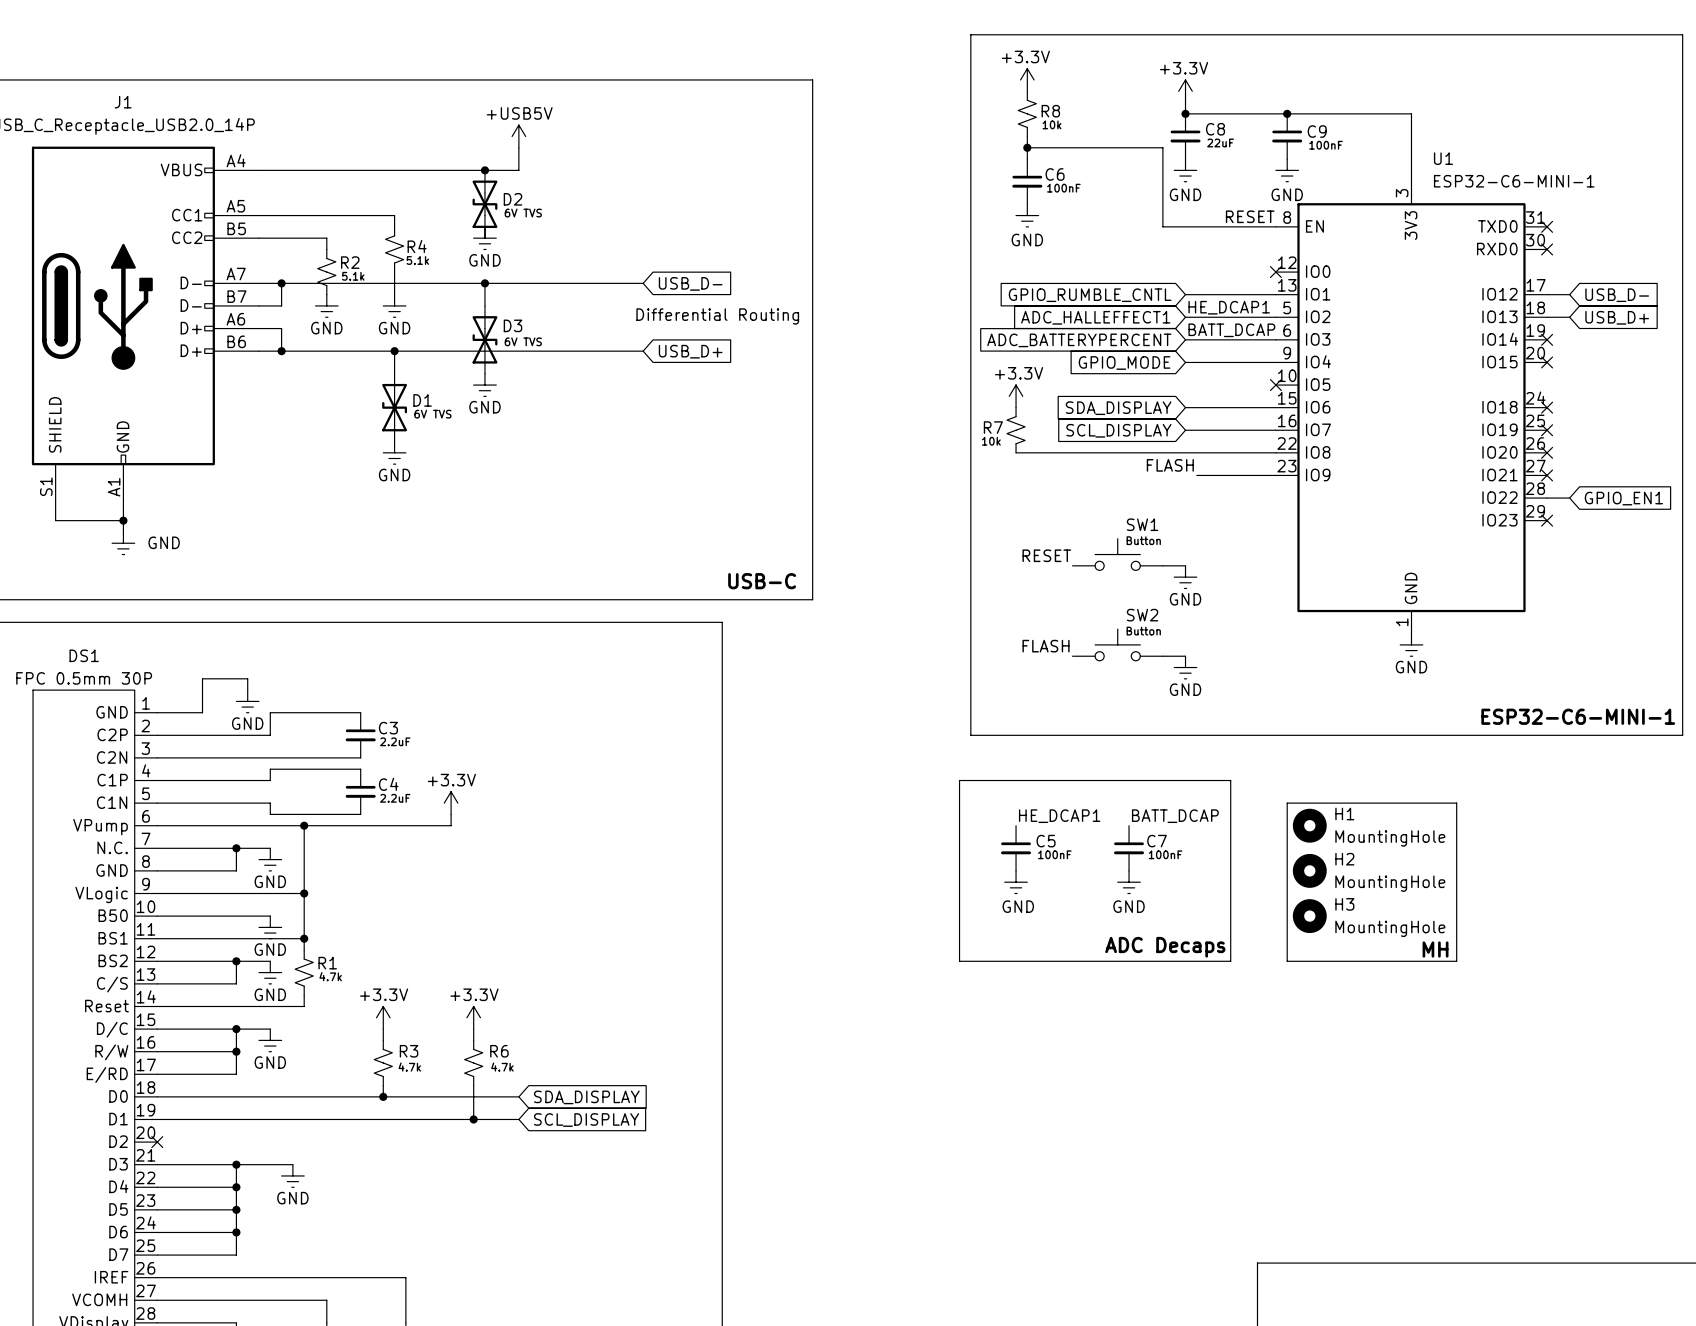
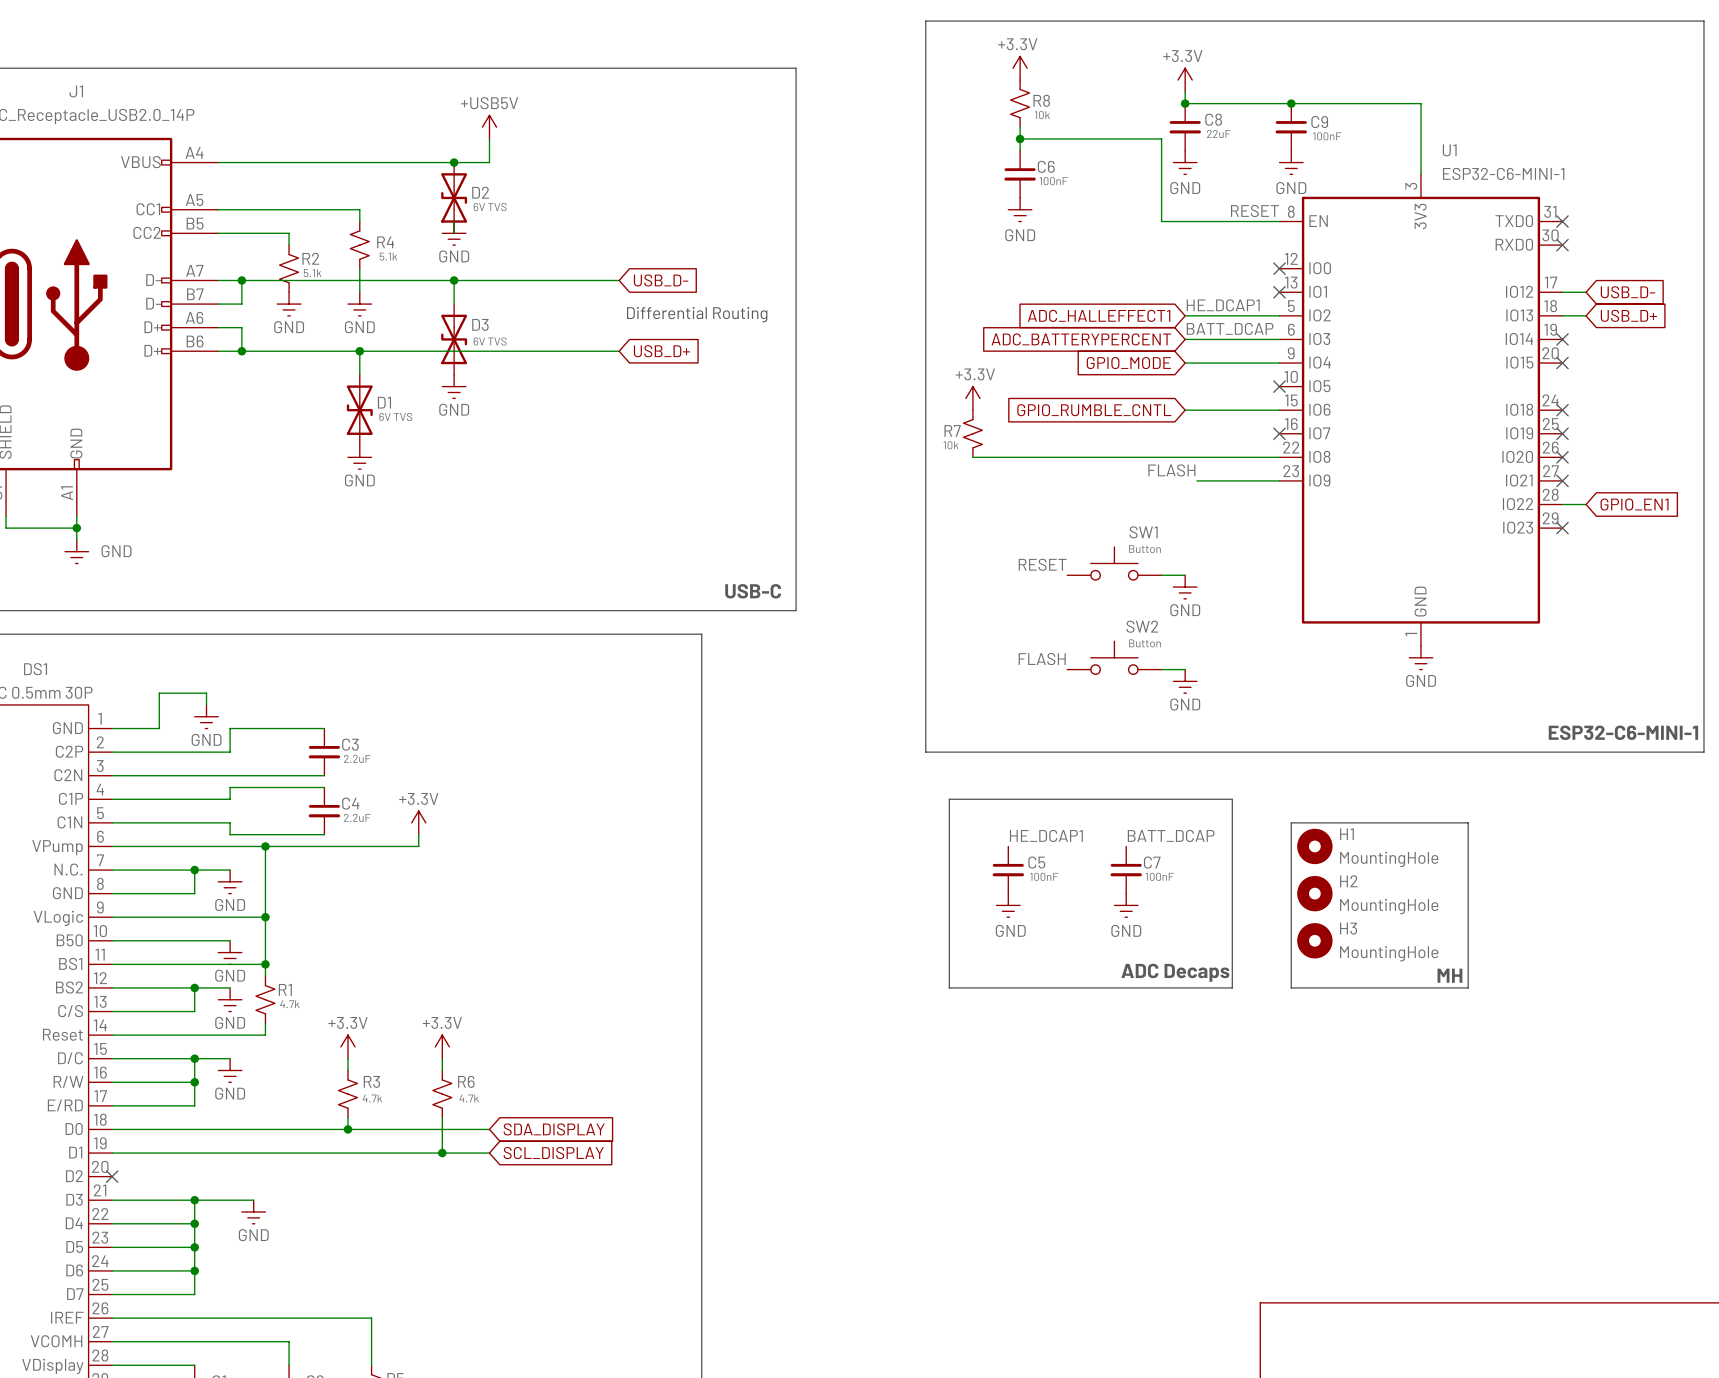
line: (970, 34) (970, 735) -> (961, 21) (925, 21) (925, 752) (961, 752)
wire: (1185, 294) (1275, 294) -> none
no-connect mark: none -> (1279, 292)
global label: GPIO_RUMBLE_CNTL (1090, 295) -> none
power symbol position: +3.3V (1016, 396) -> +3.3V (972, 398)
global label: SDA_DISPLAY (1118, 408) -> GPIO_RUMBLE_CNTL (1094, 410)
R7 position: (1016, 430) -> (972, 433)
global label: SCL_DISPLAY (1118, 430) -> none
wire: (1185, 430) (1275, 430) -> none
no-connect mark: none -> (1279, 433)
wire: none -> (972, 457) (1008, 457)

